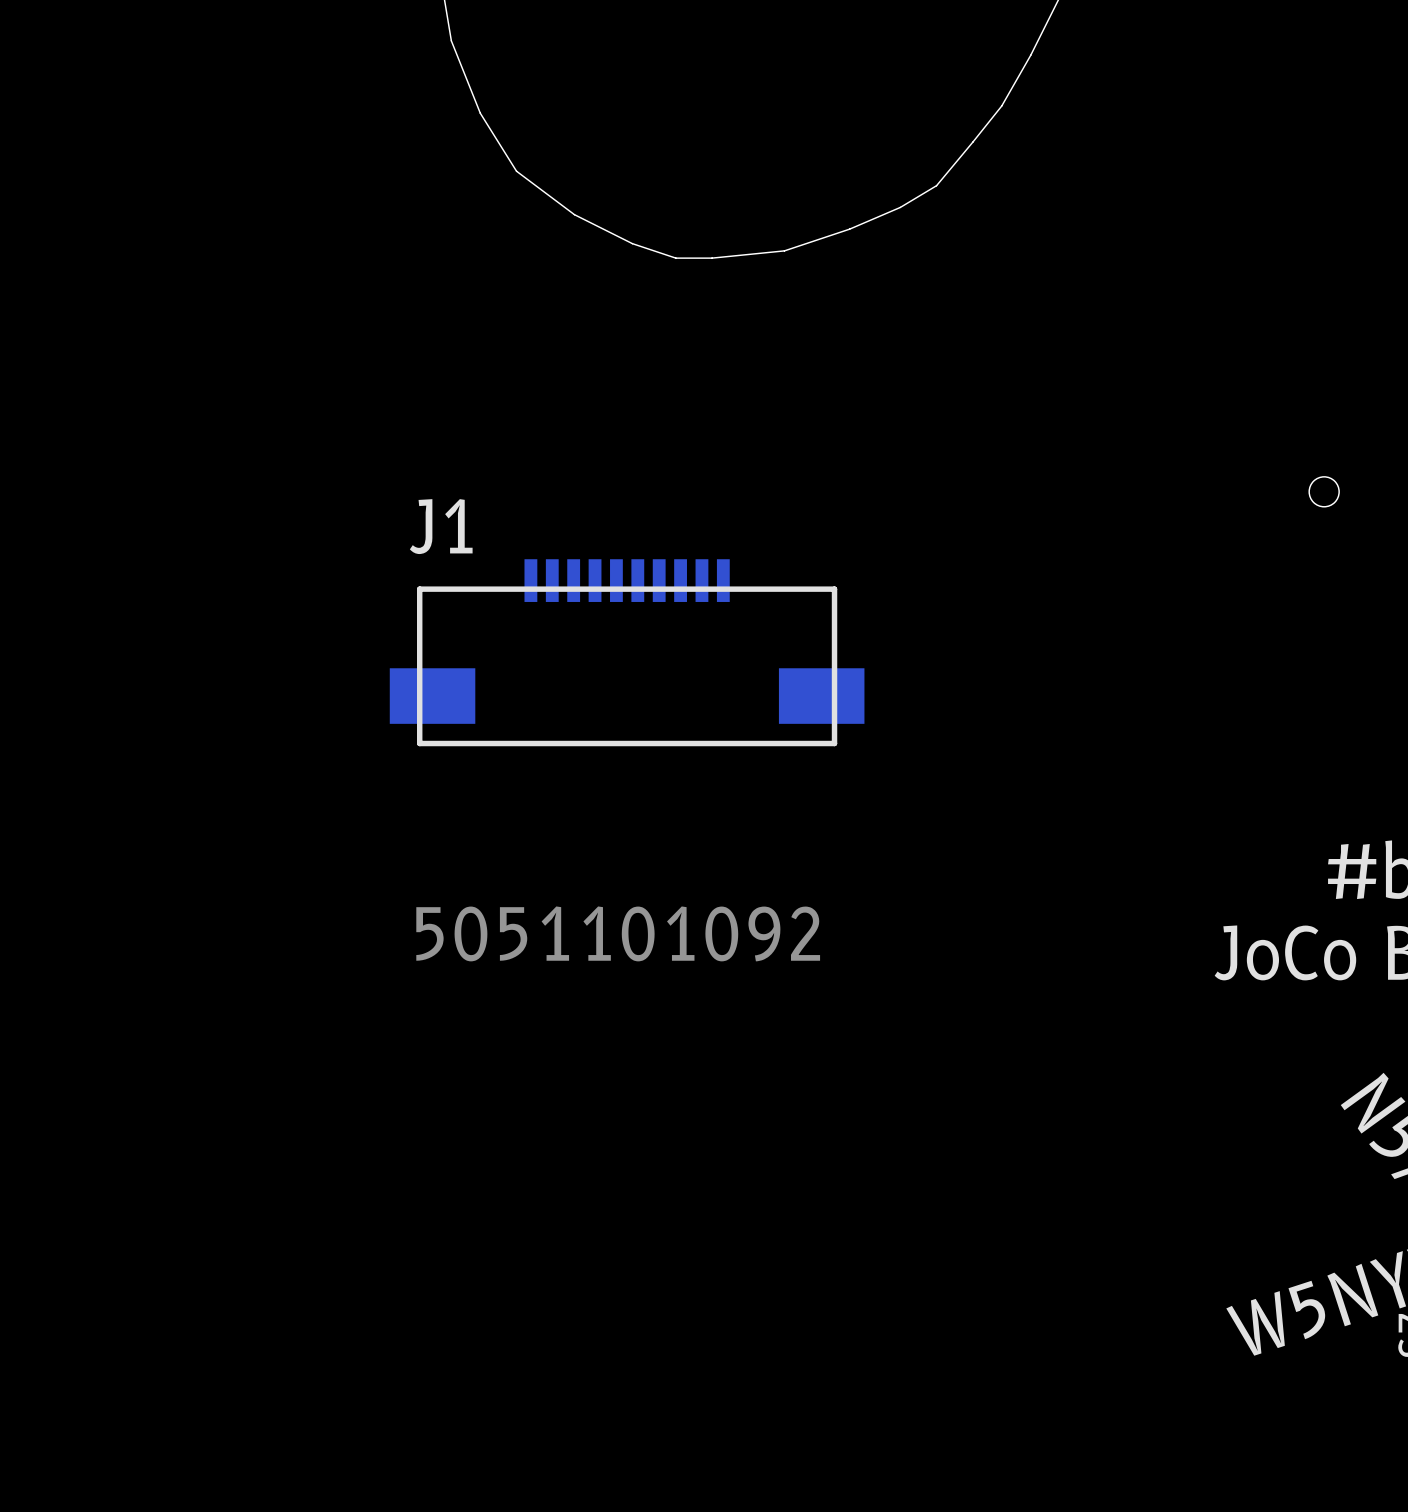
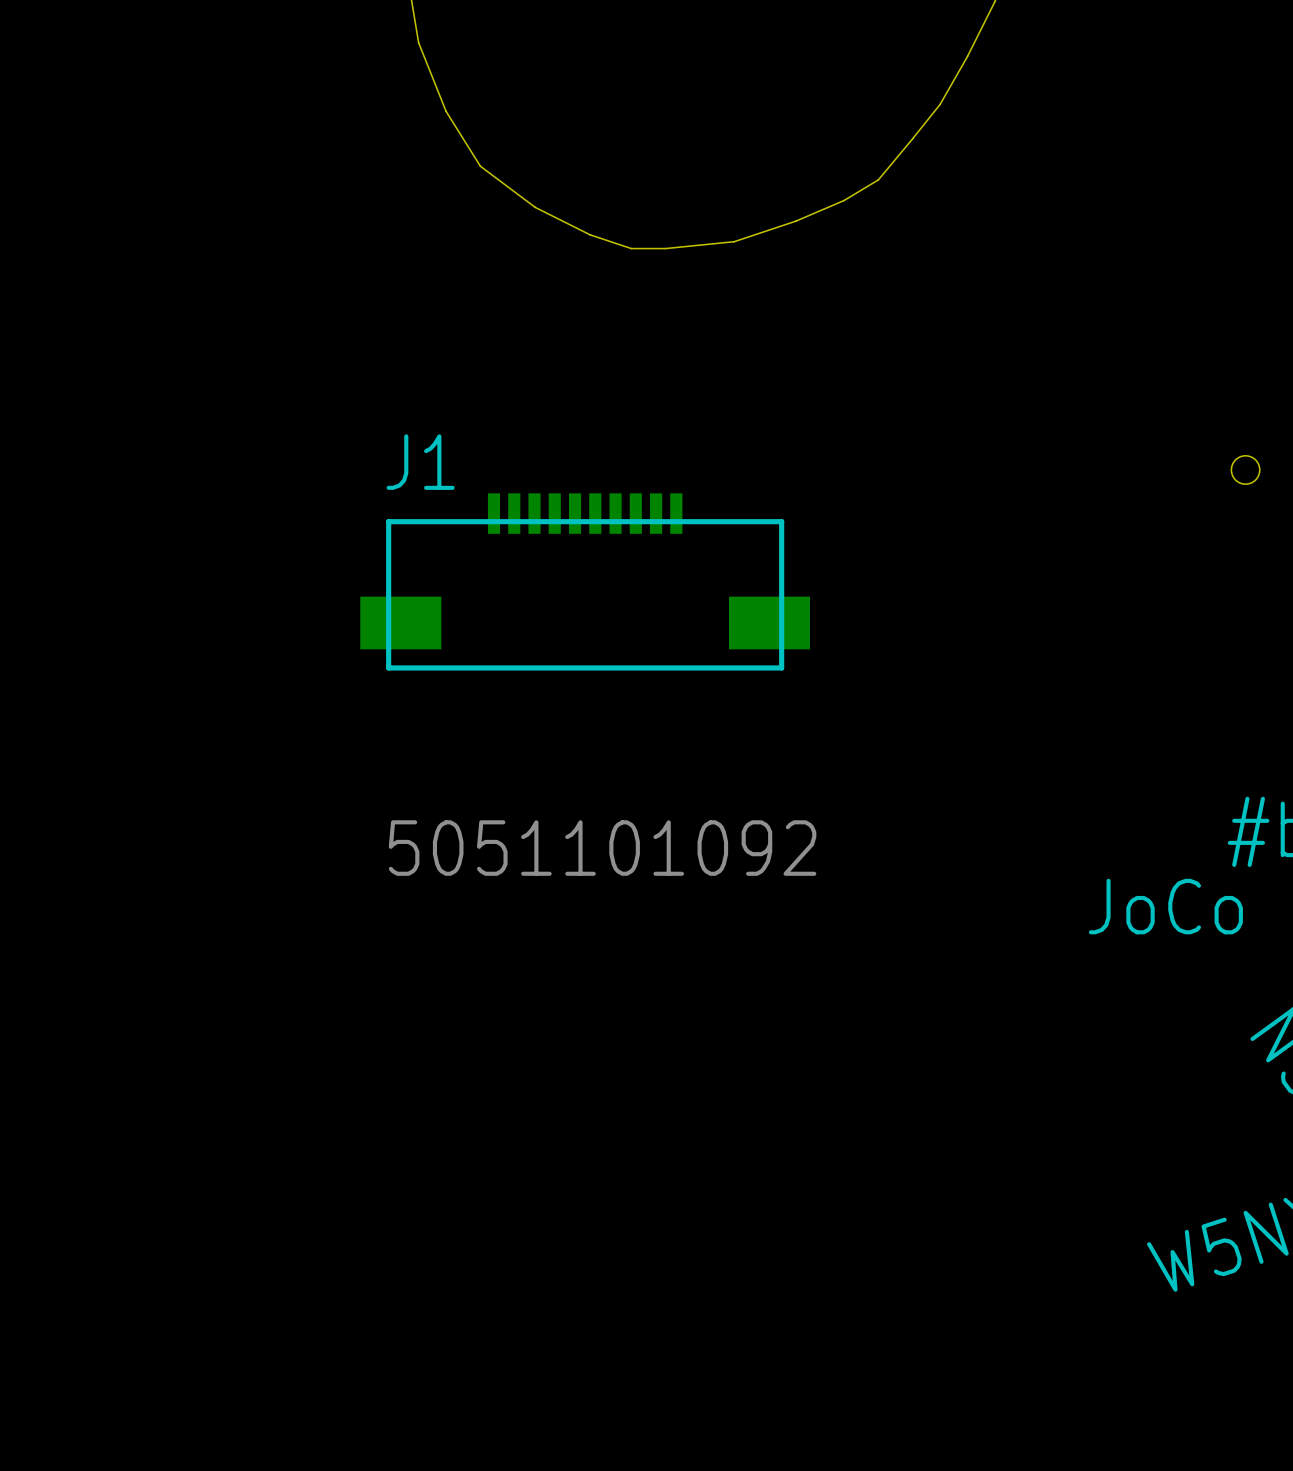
J1 position: (627, 652) -> (585, 581)

